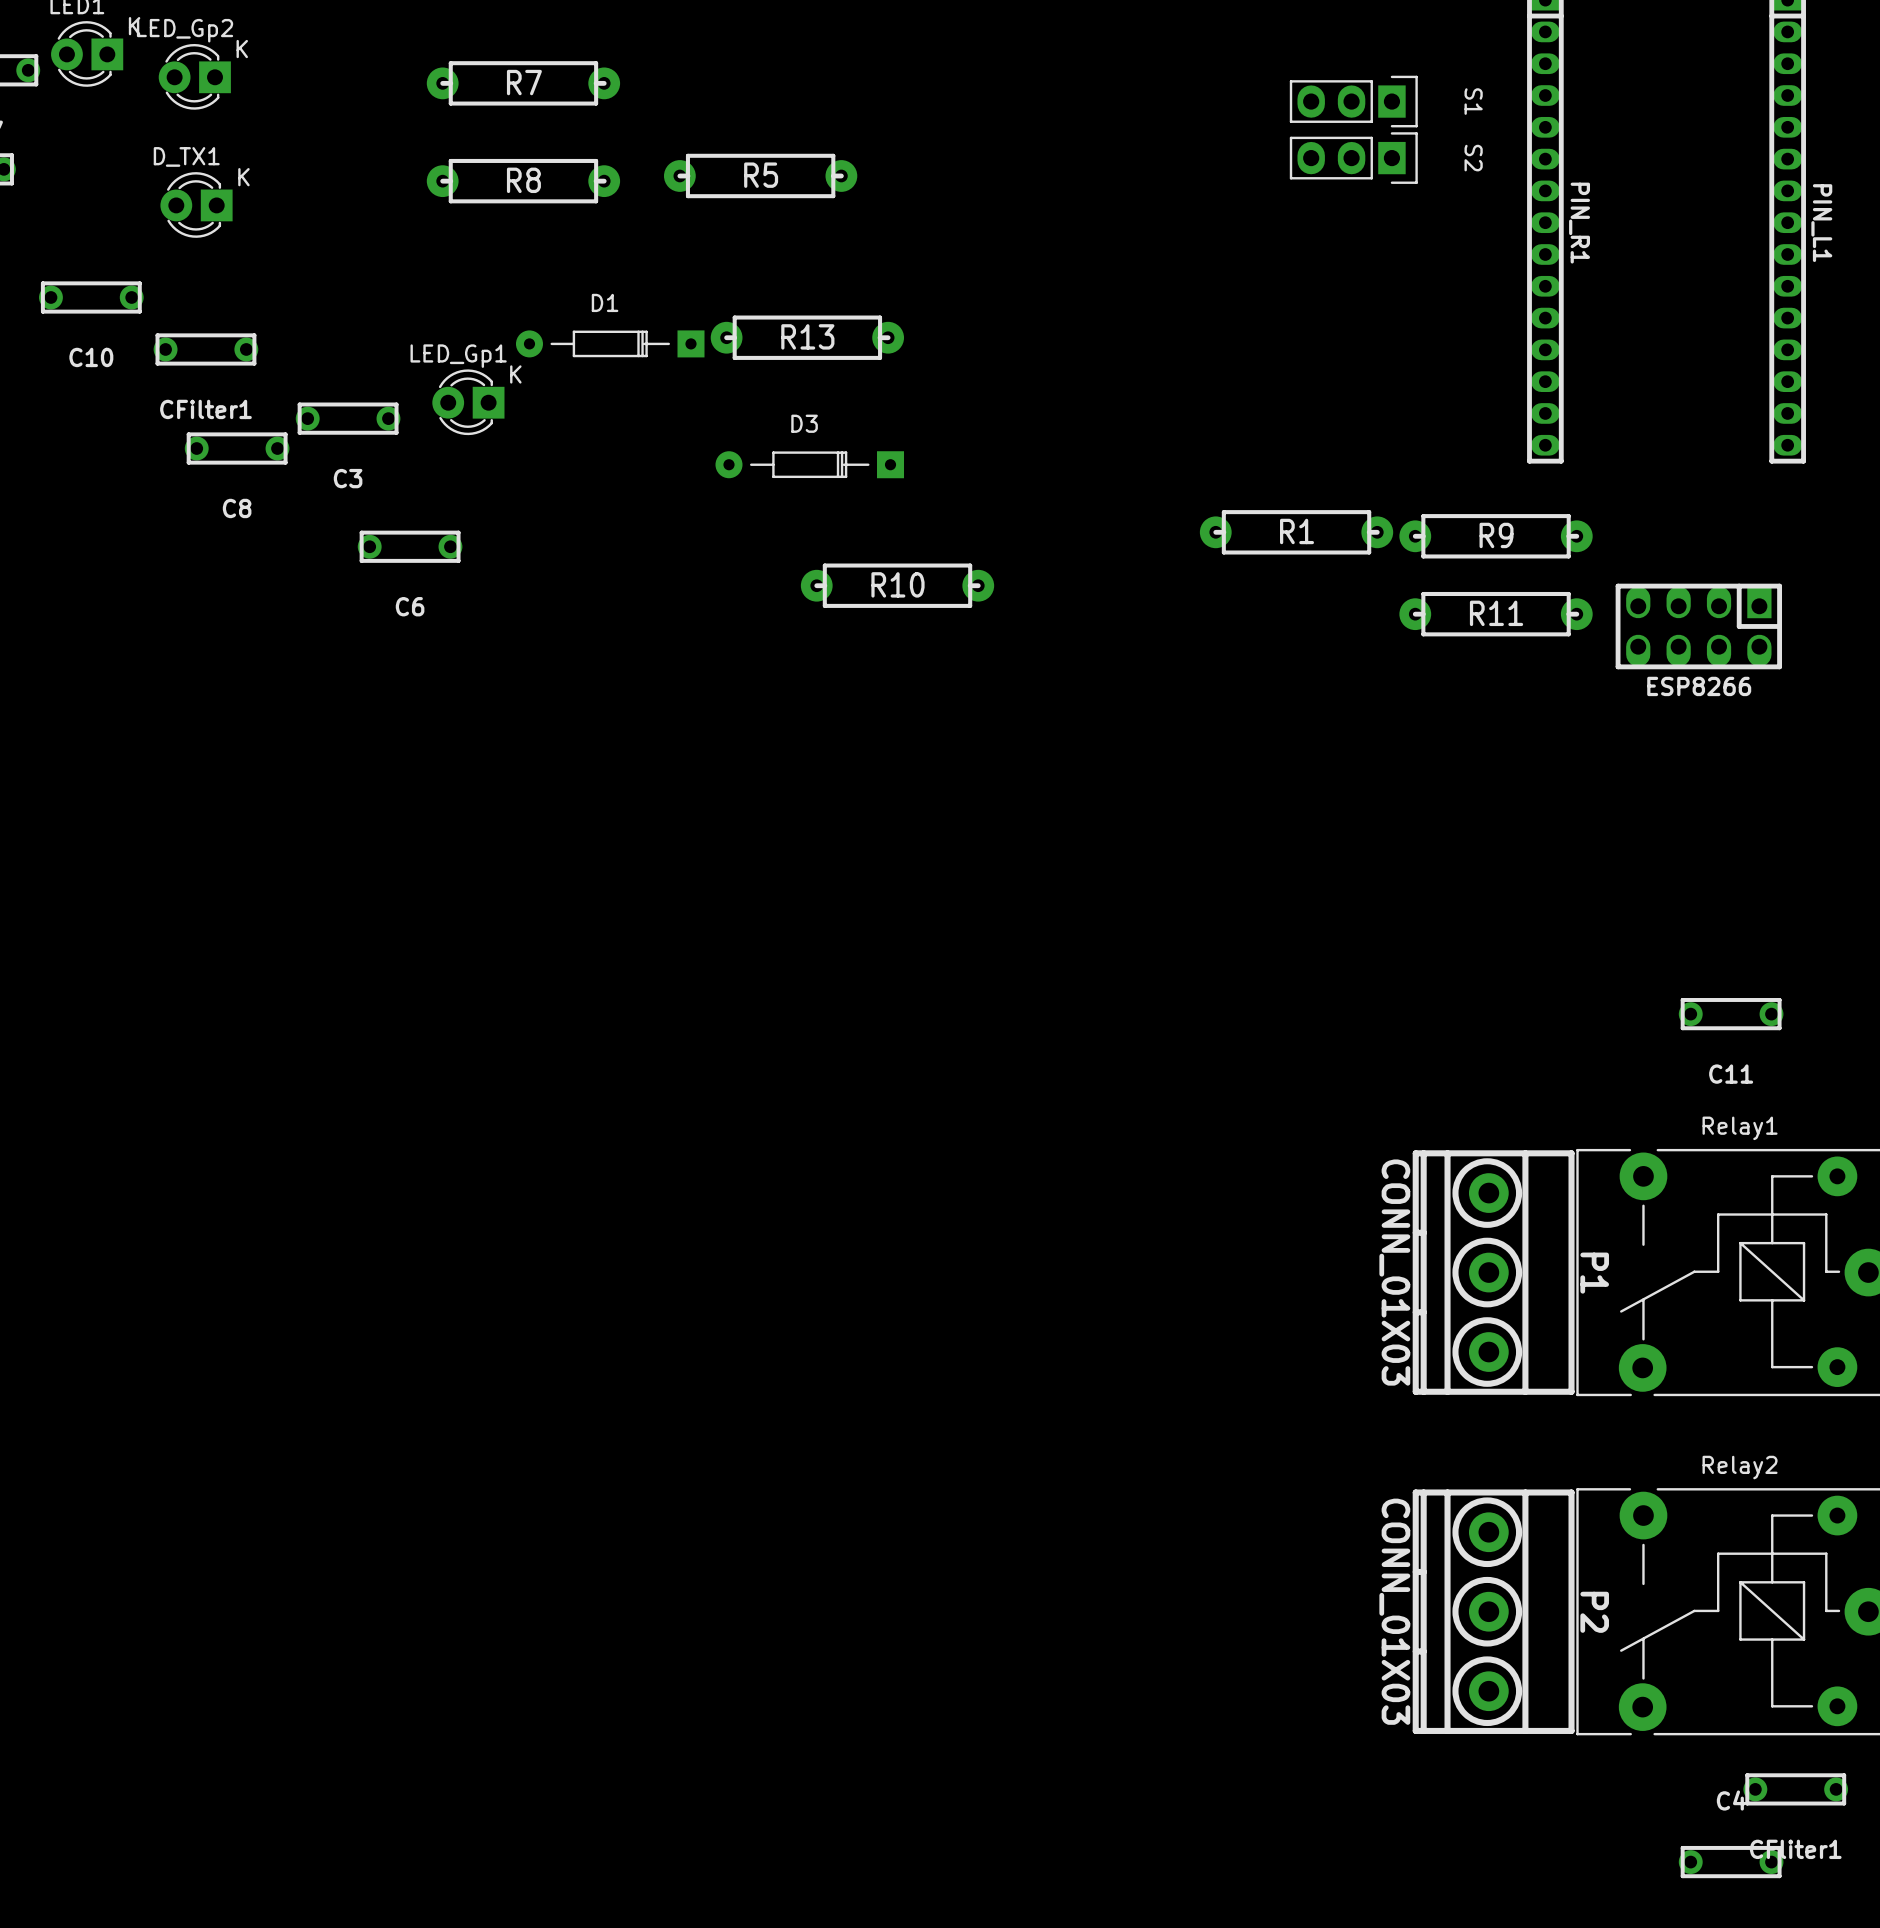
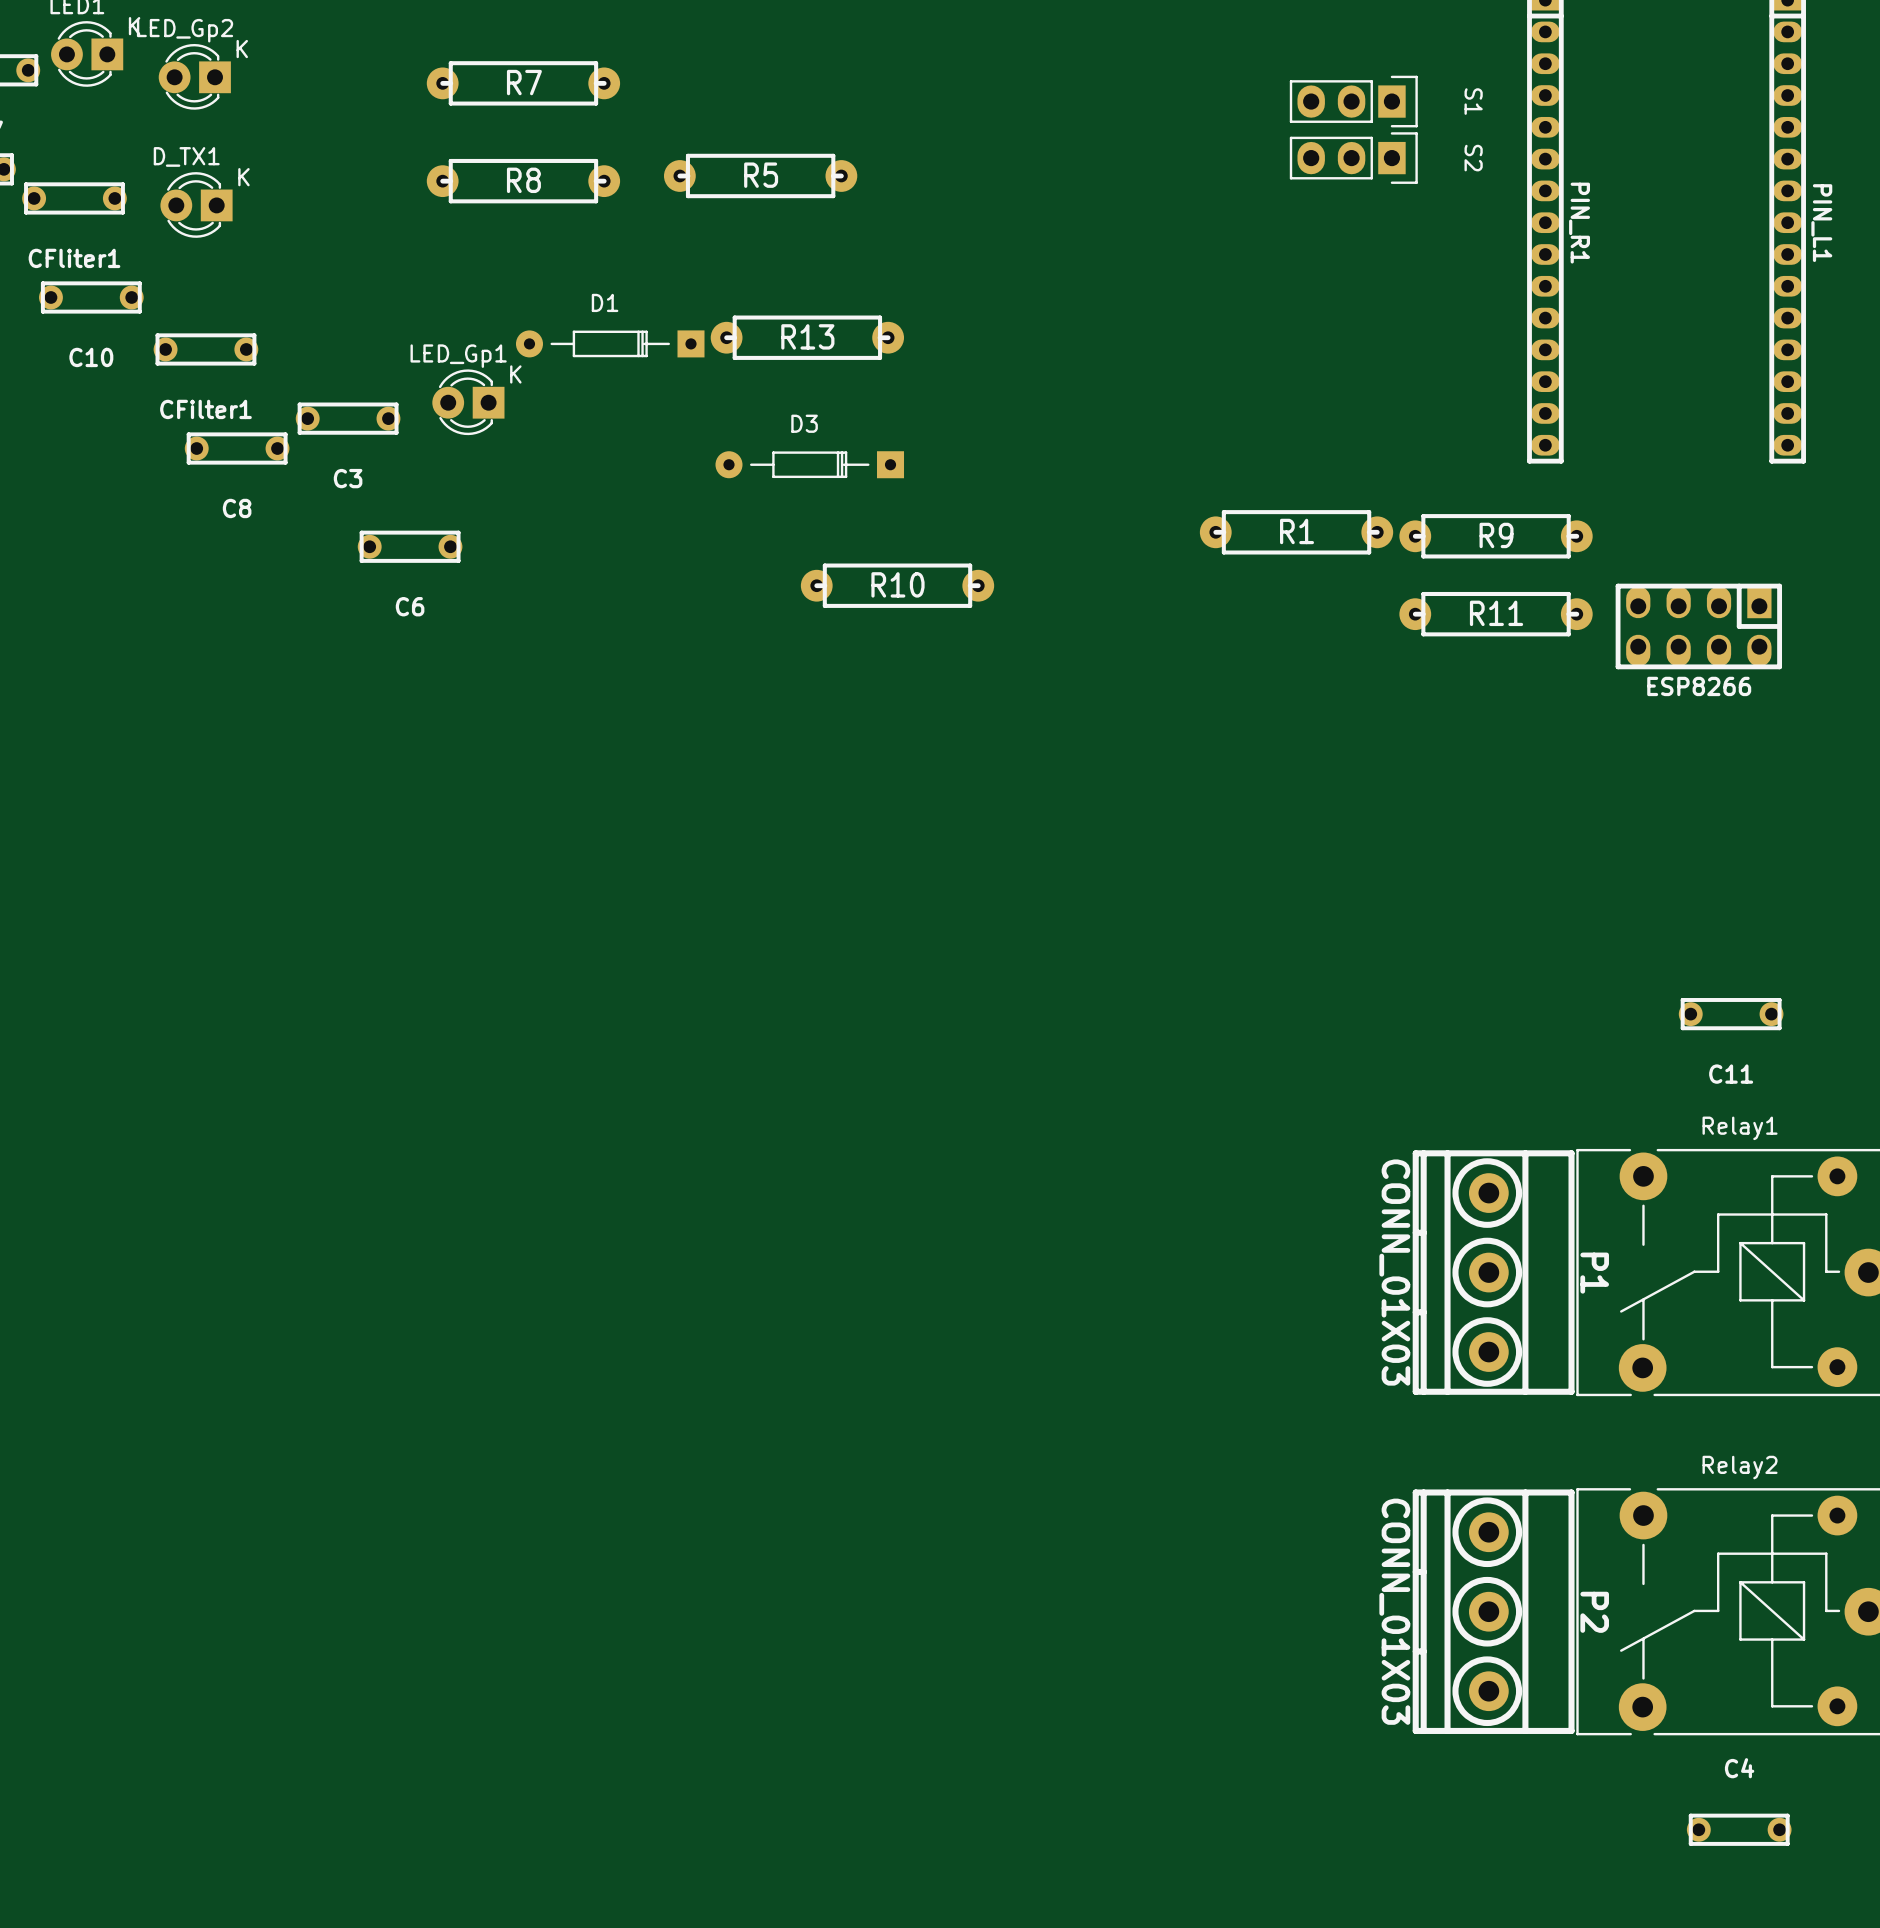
CFliter1 position: (1795, 1789) -> (74, 198)
C4 position: (1731, 1862) -> (1739, 1829)

